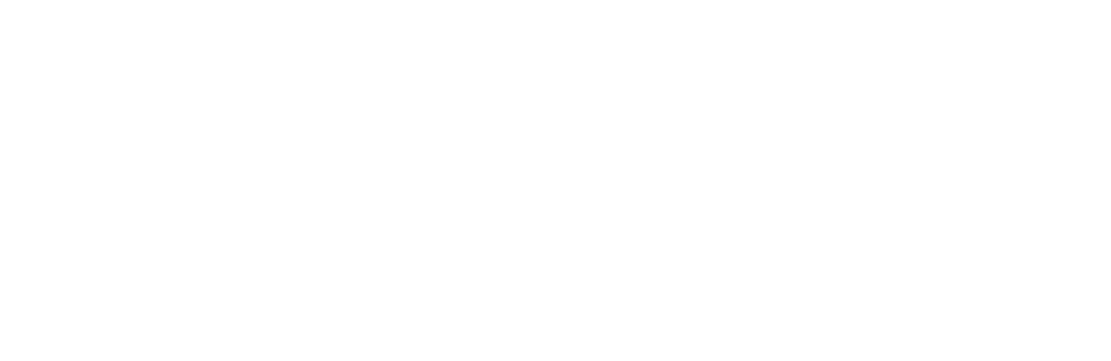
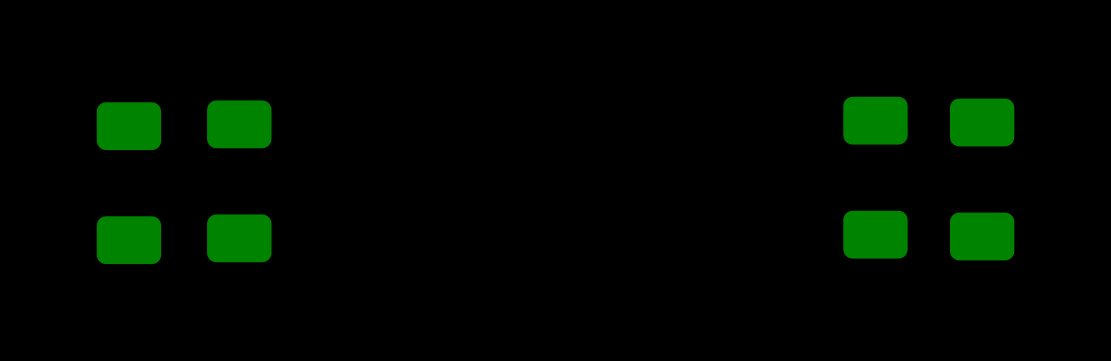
part: none -> (875, 177)
part: none -> (982, 179)
part: none -> (239, 181)
part: none -> (128, 183)

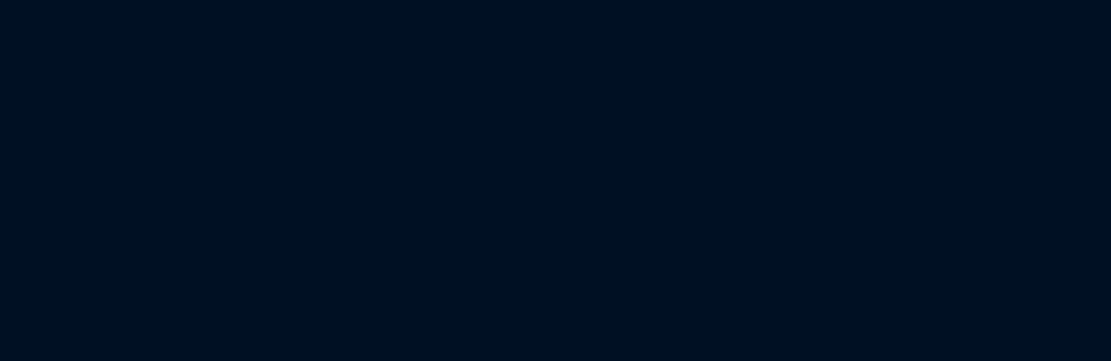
part: (875, 177) -> none
part: (982, 179) -> none
part: (239, 181) -> none
part: (128, 183) -> none

